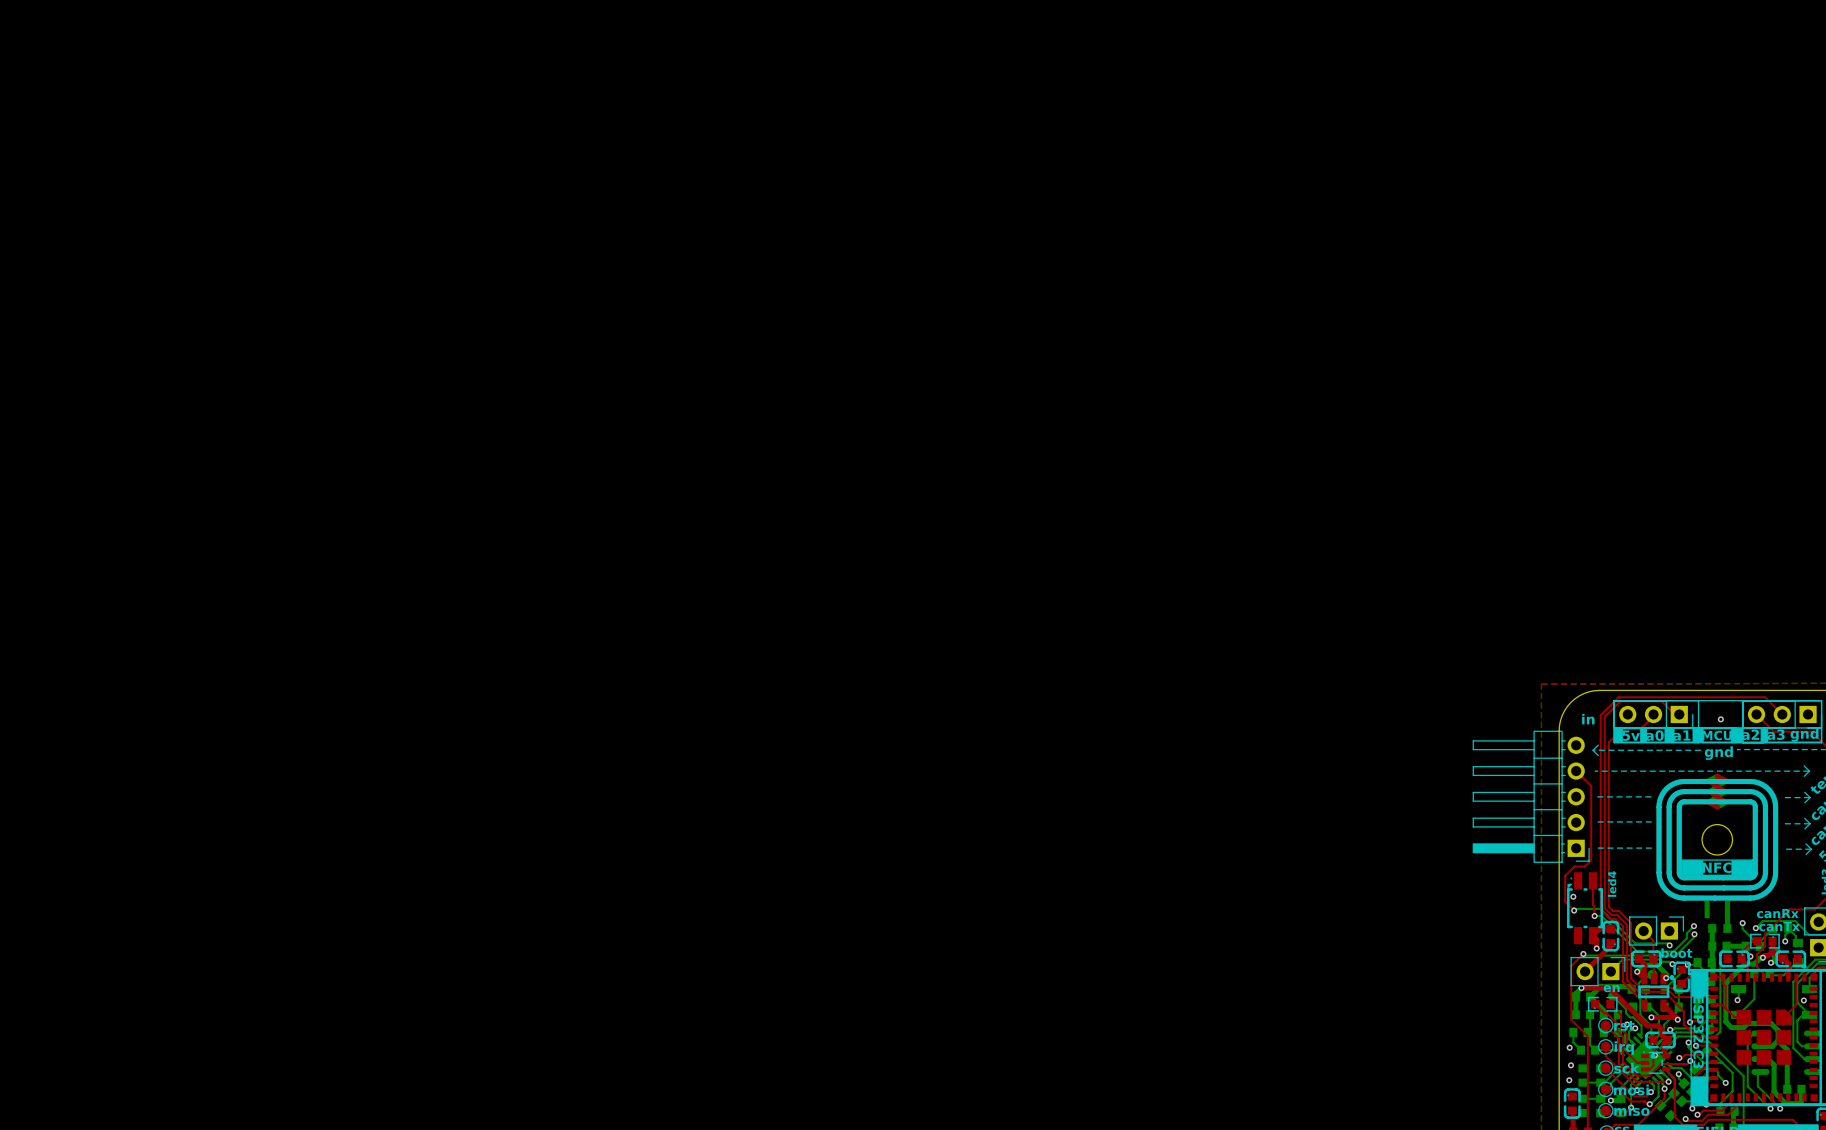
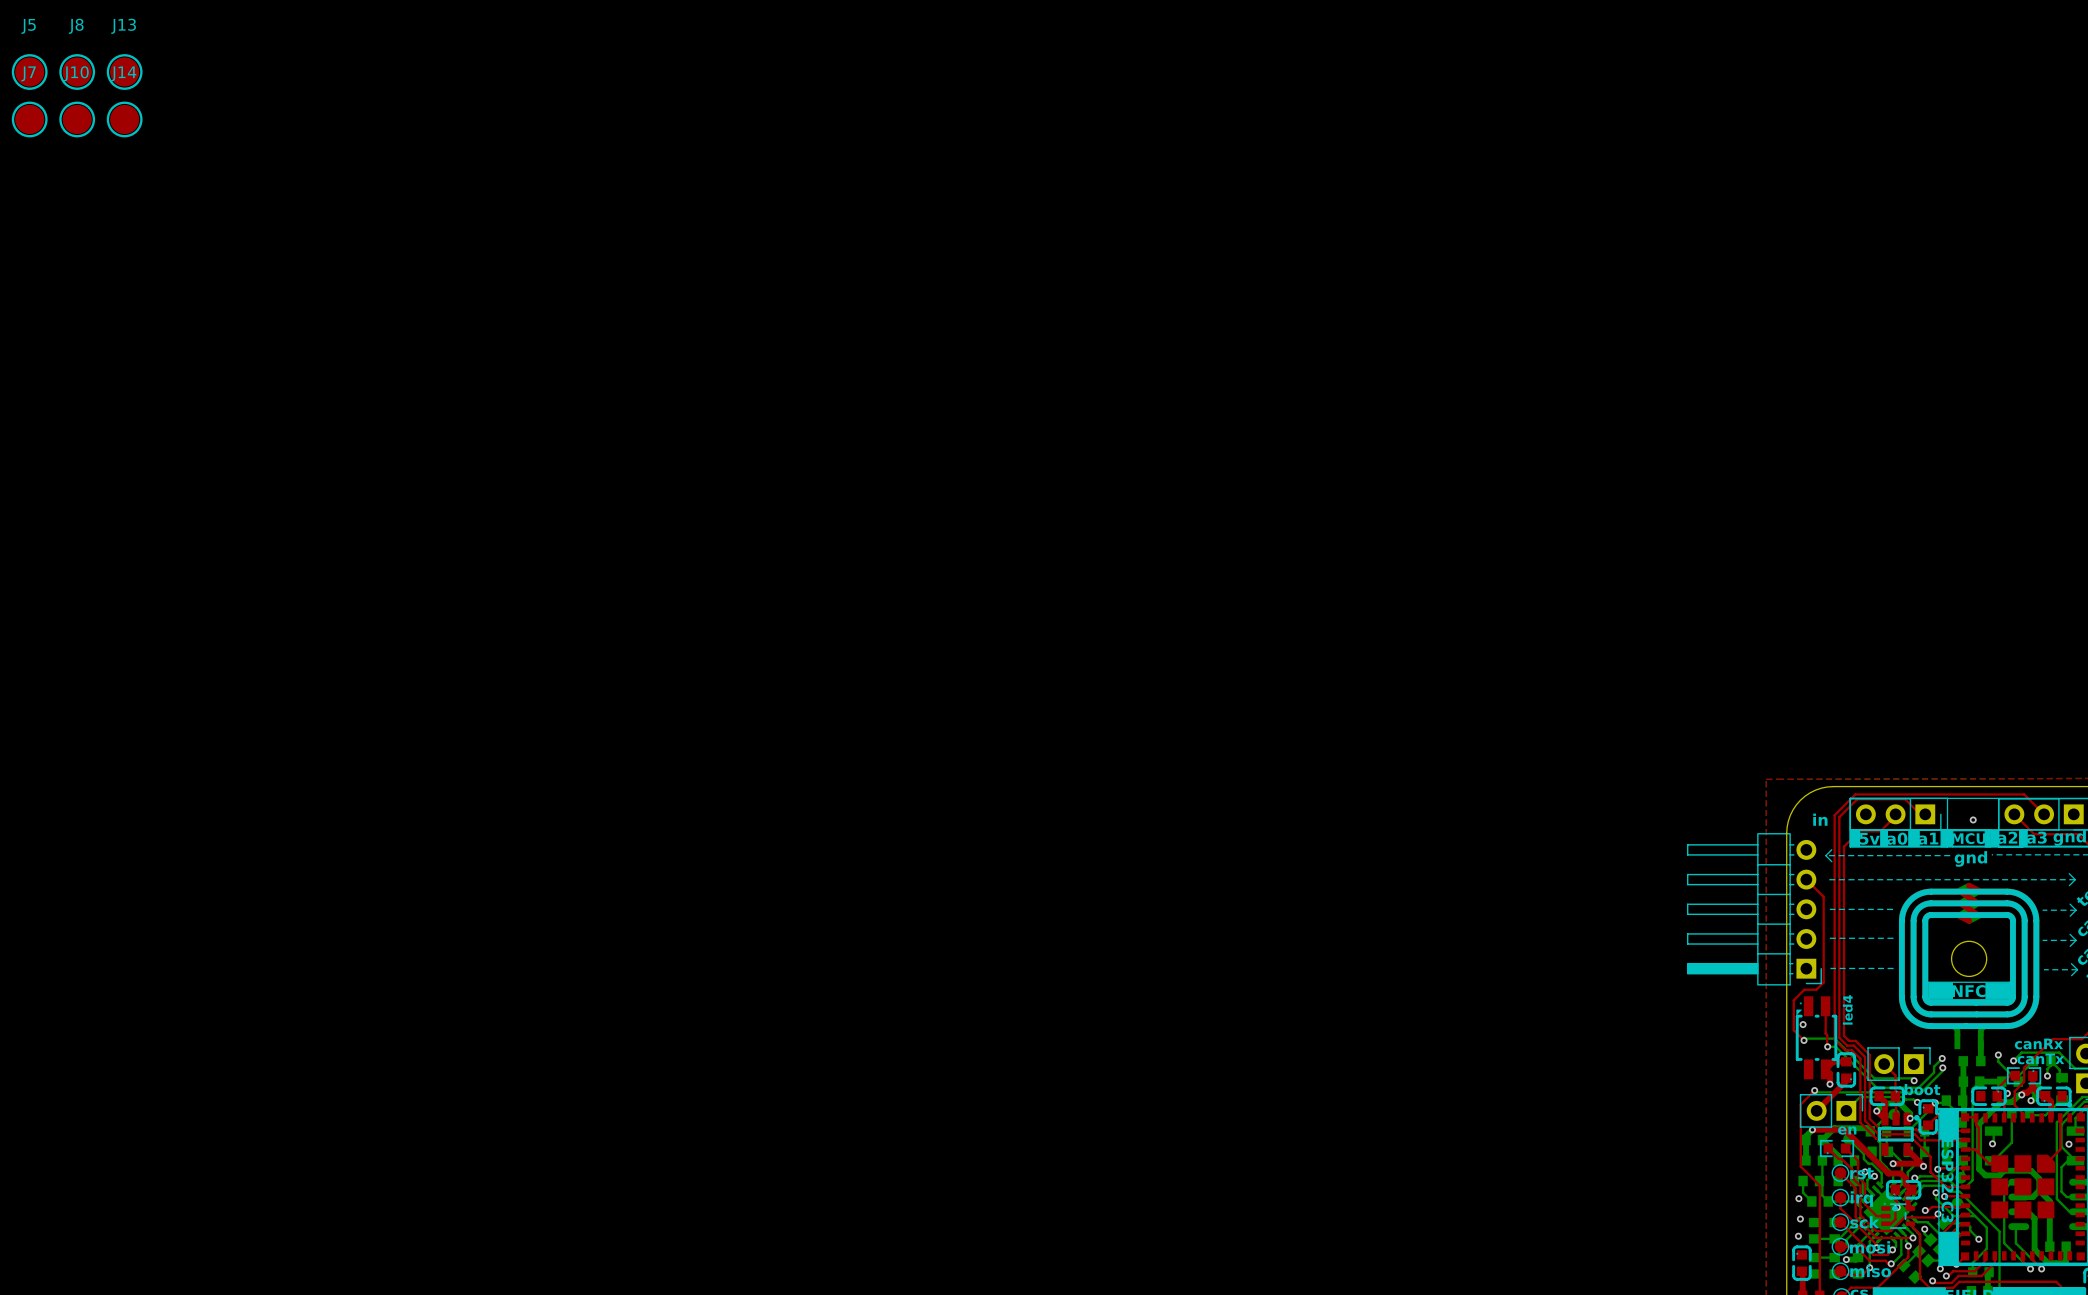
J5: none -> (29, 72)
J8: none -> (77, 72)
J13: none -> (124, 72)
J7: none -> (29, 119)
J10: none -> (77, 119)
J14: none -> (124, 119)

